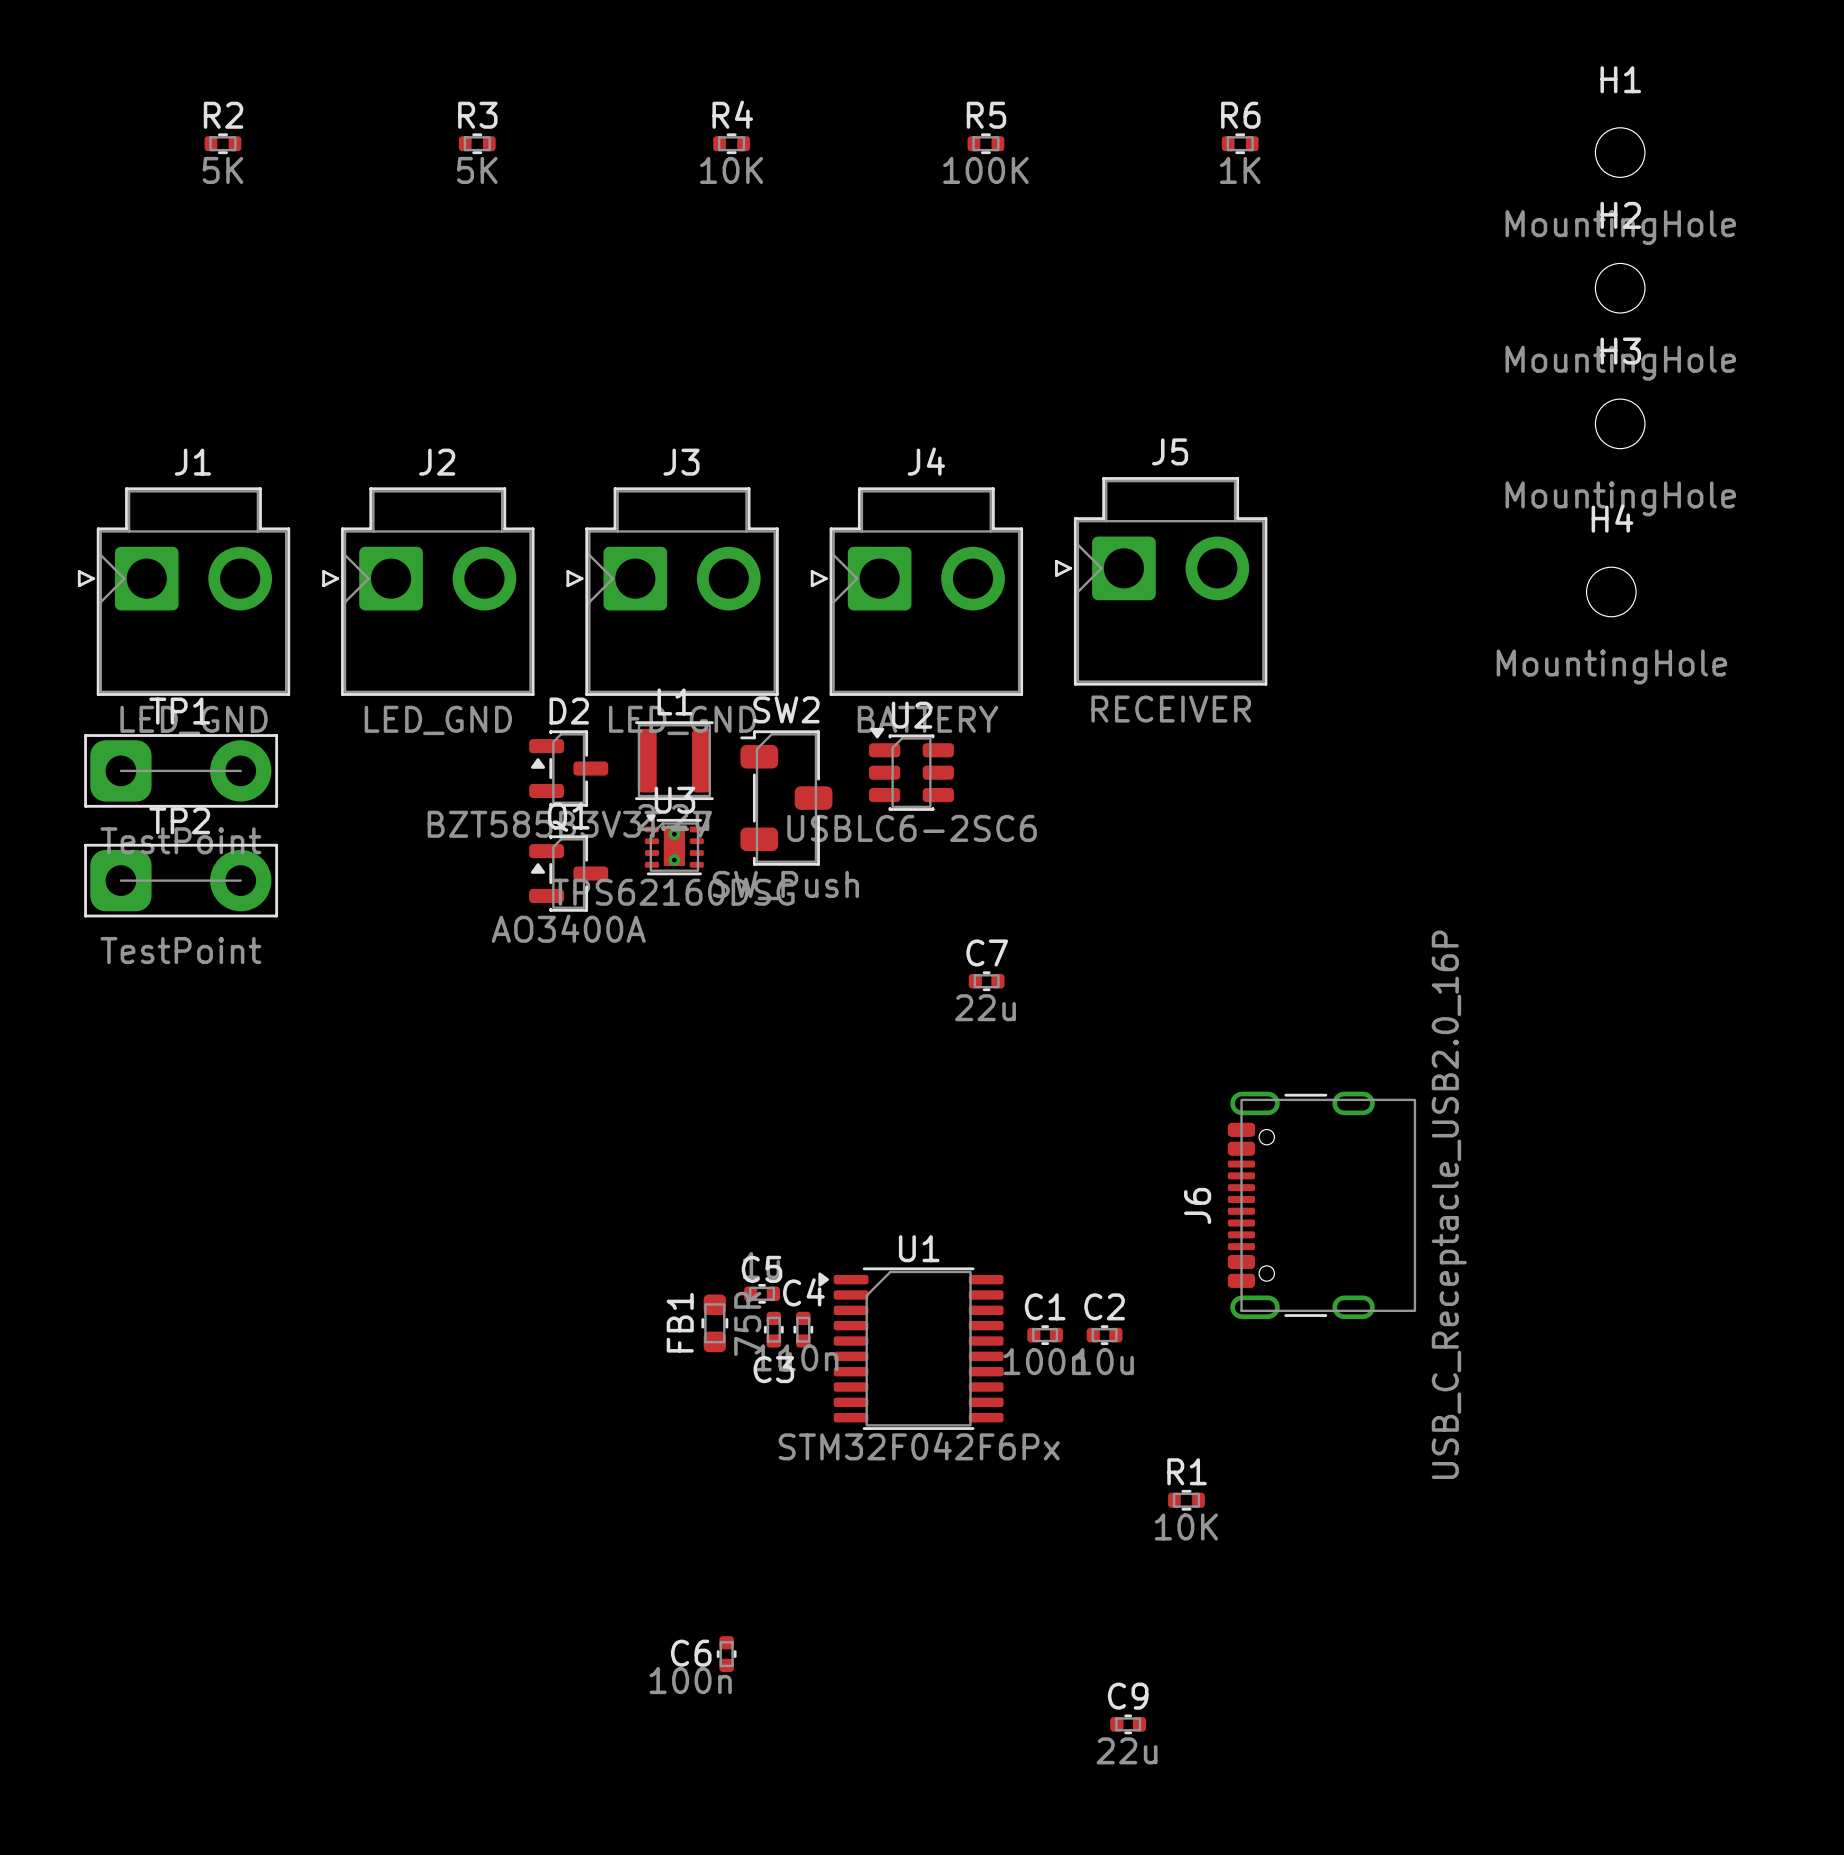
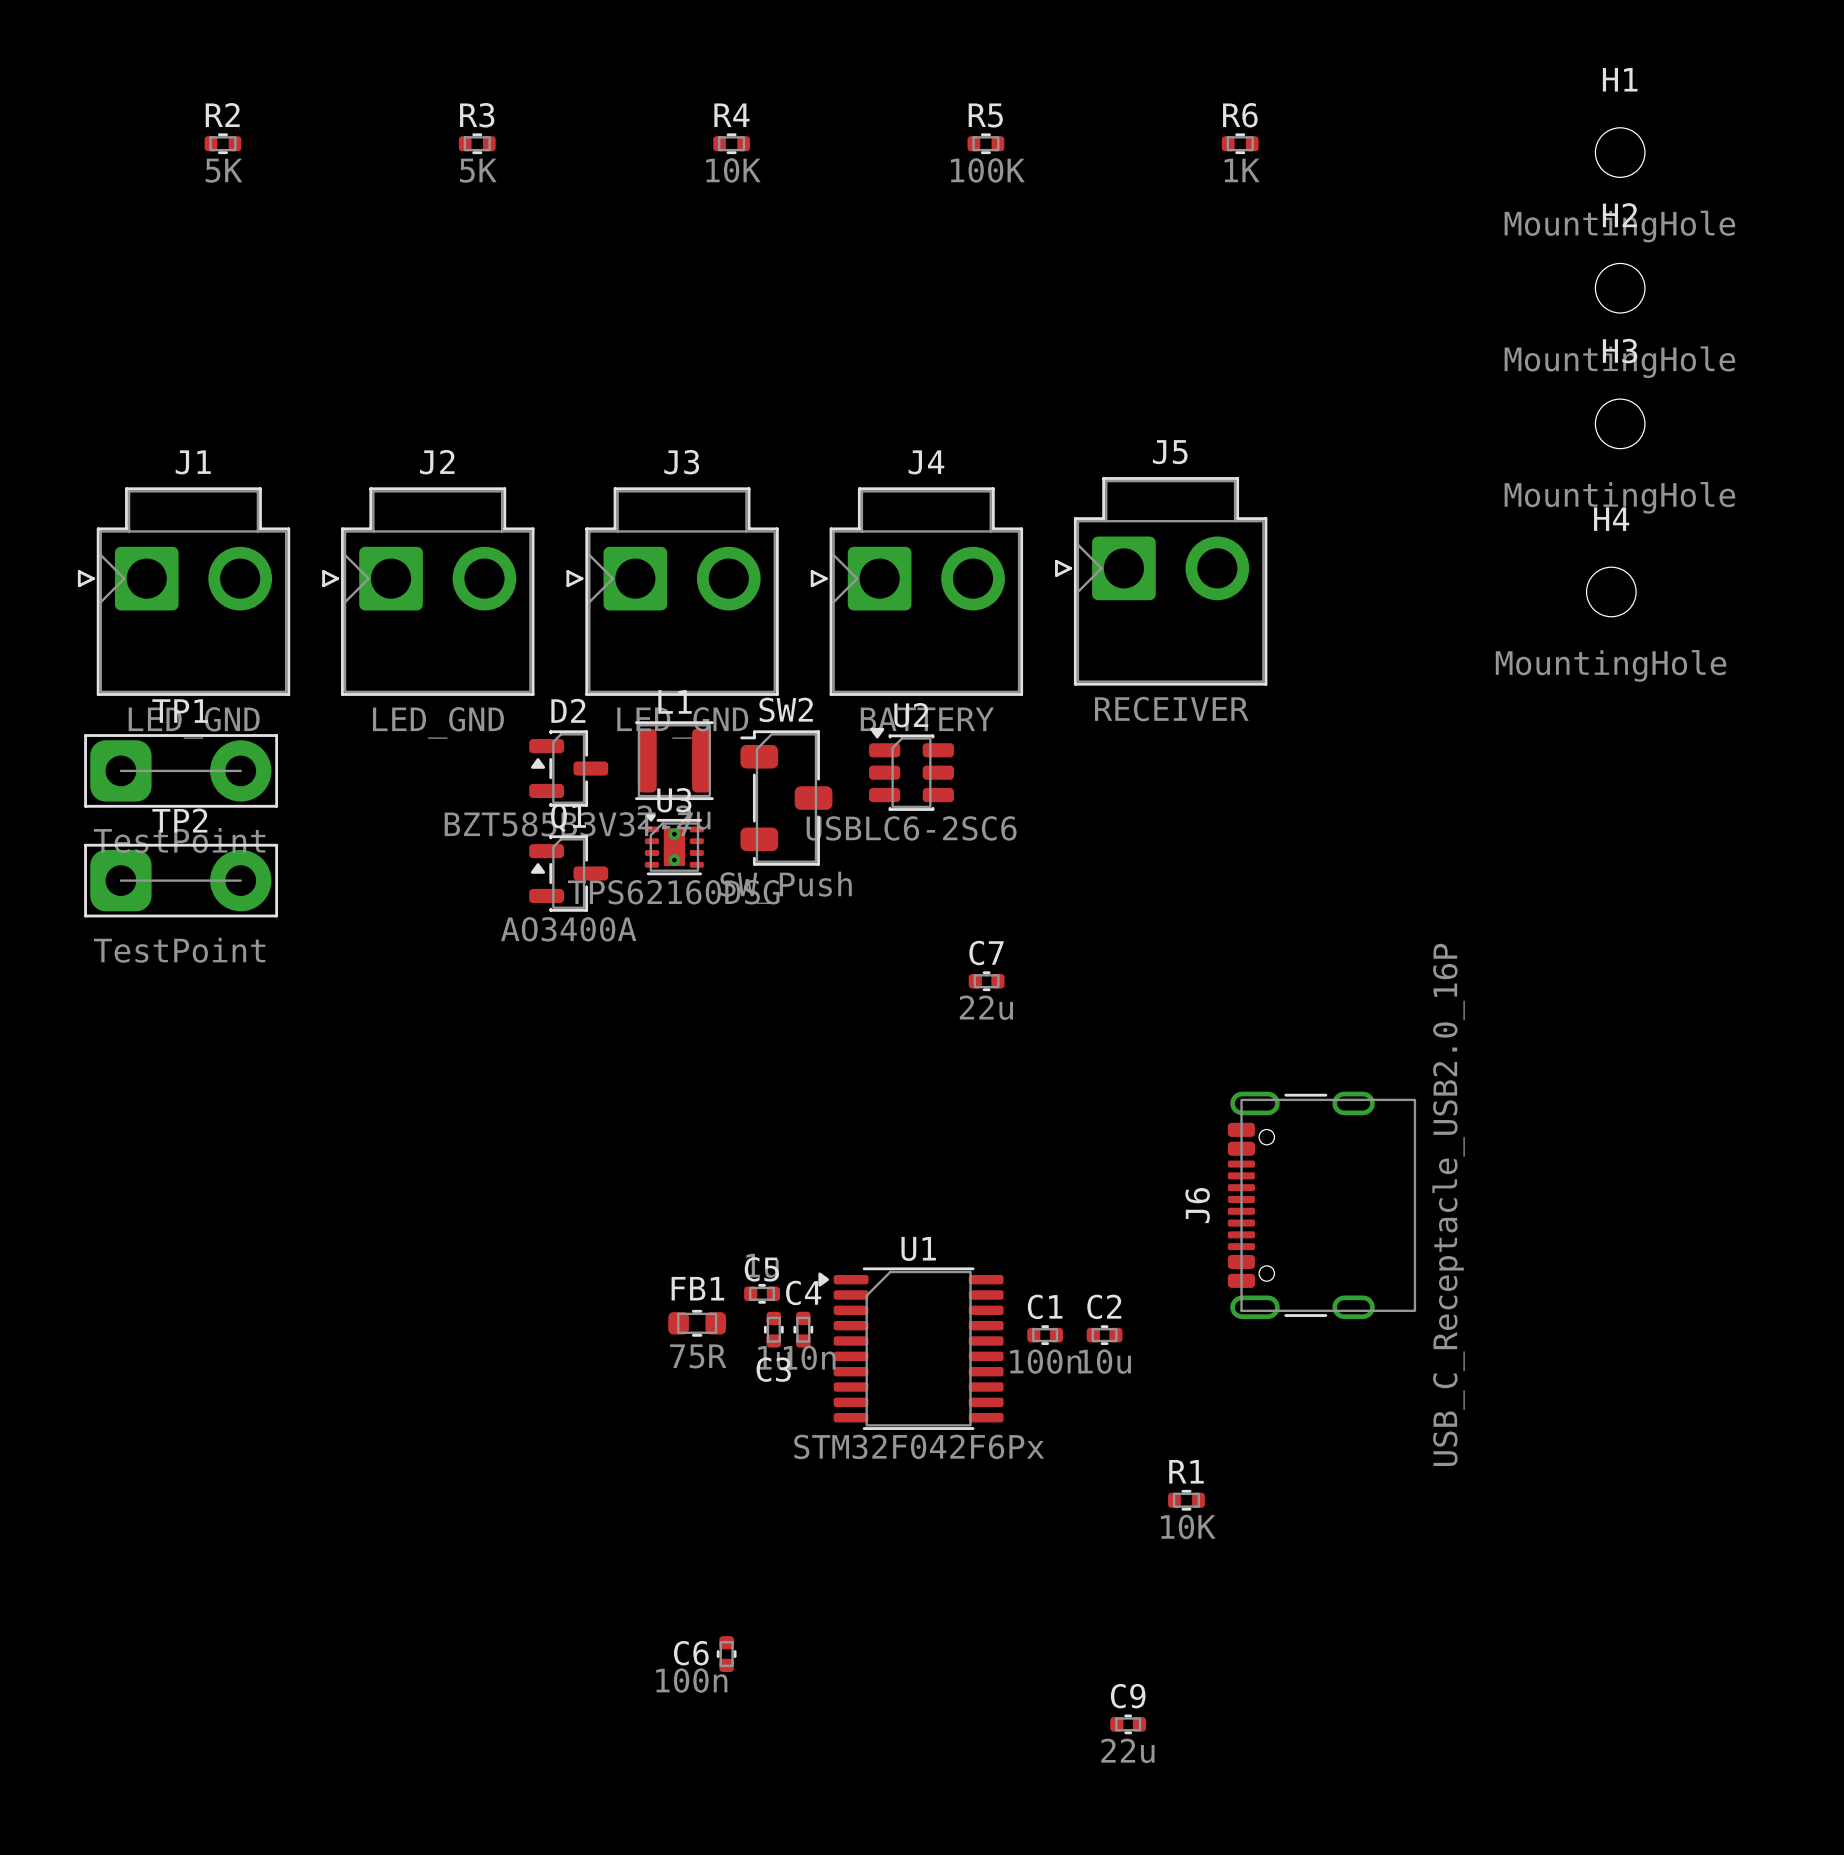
FB1 rotation: 0° (714, 1323) -> 90° clockwise (697, 1323)

